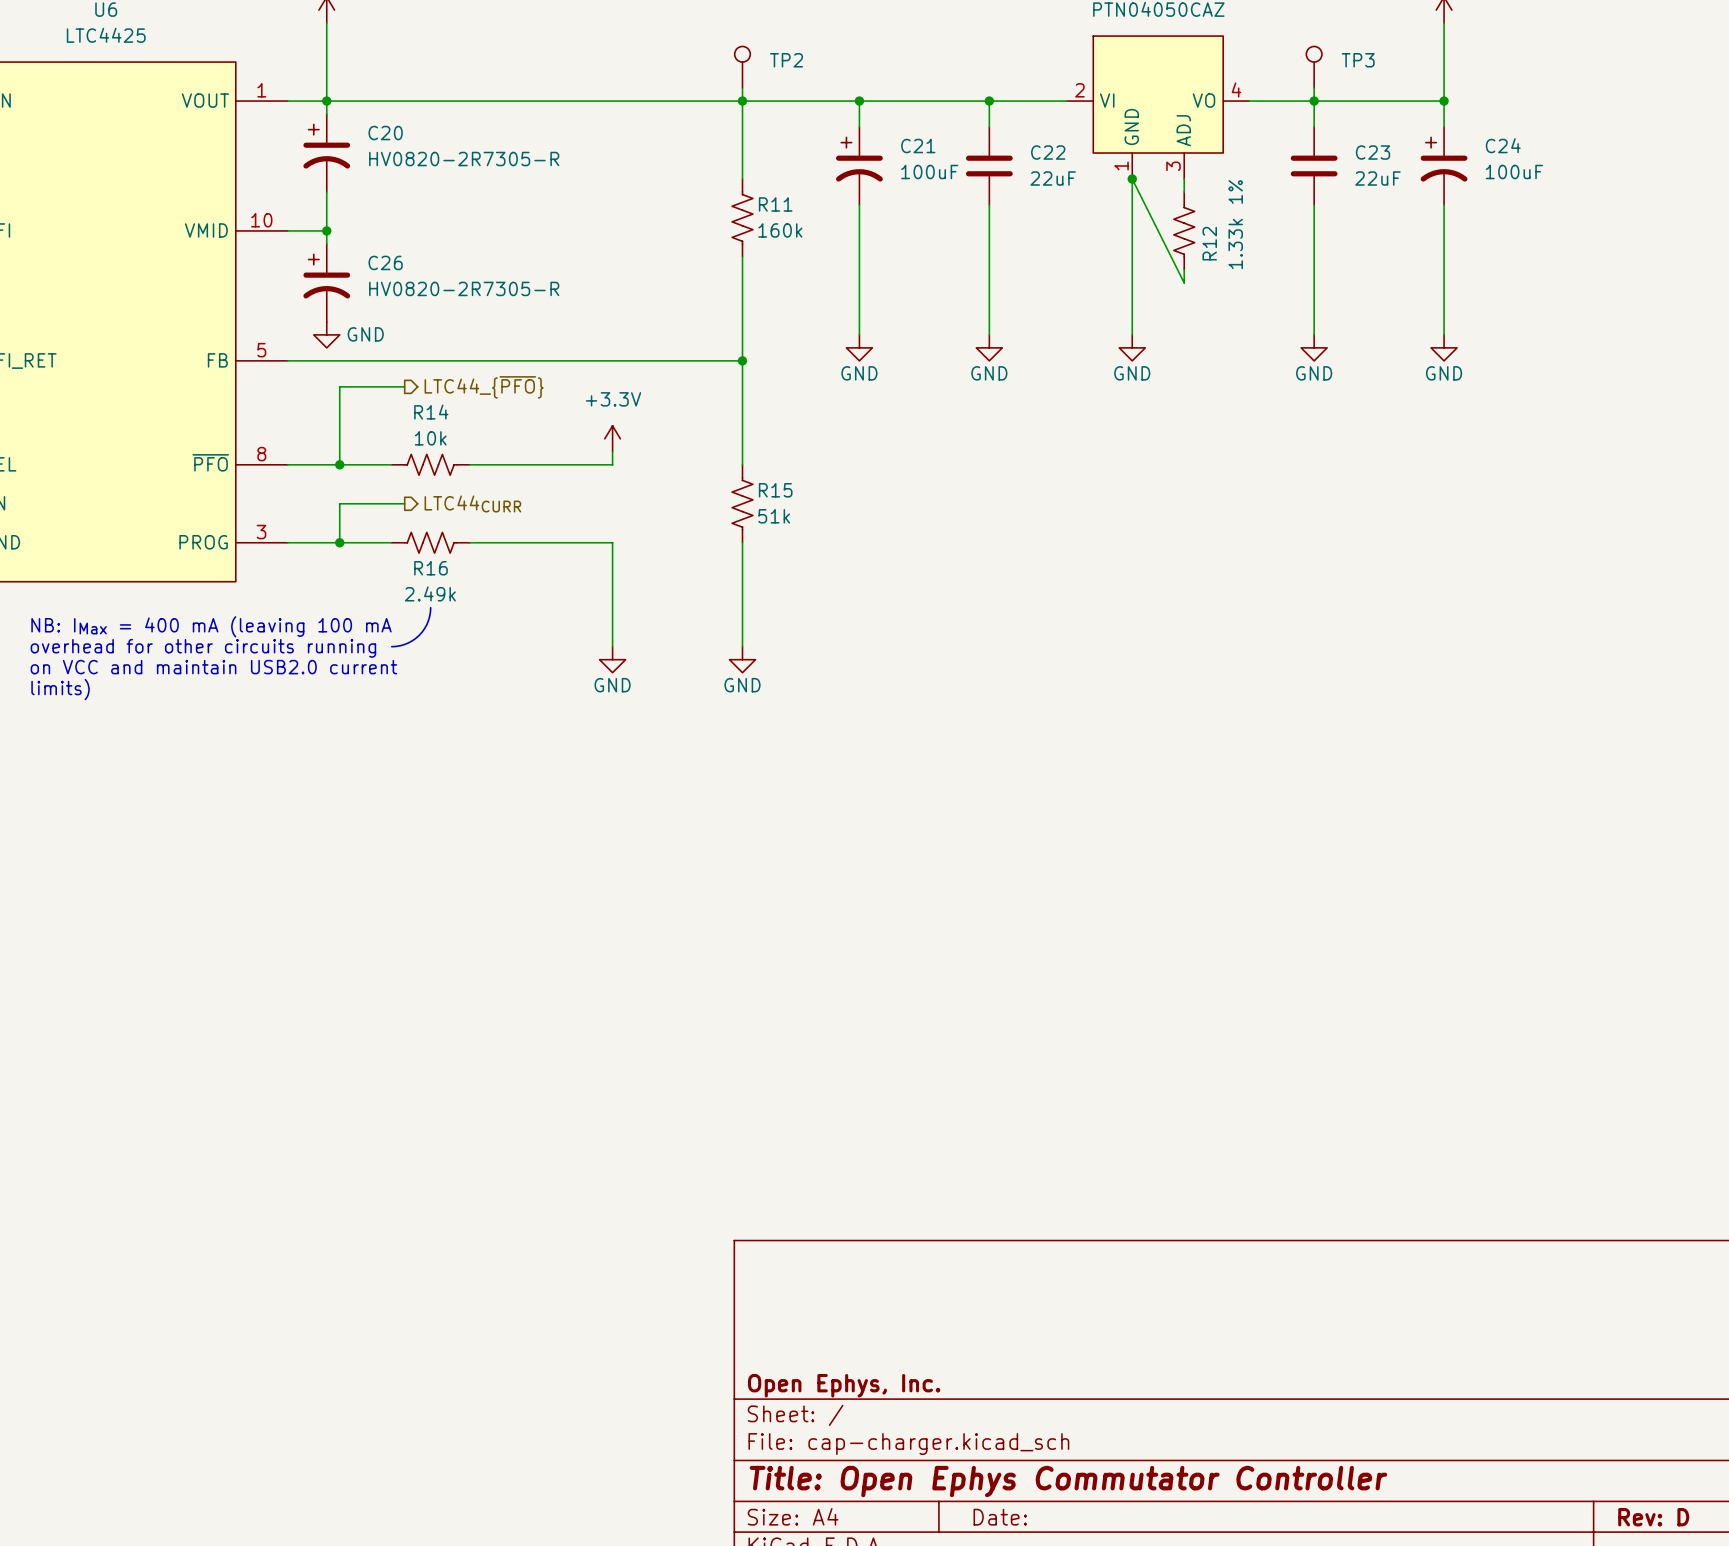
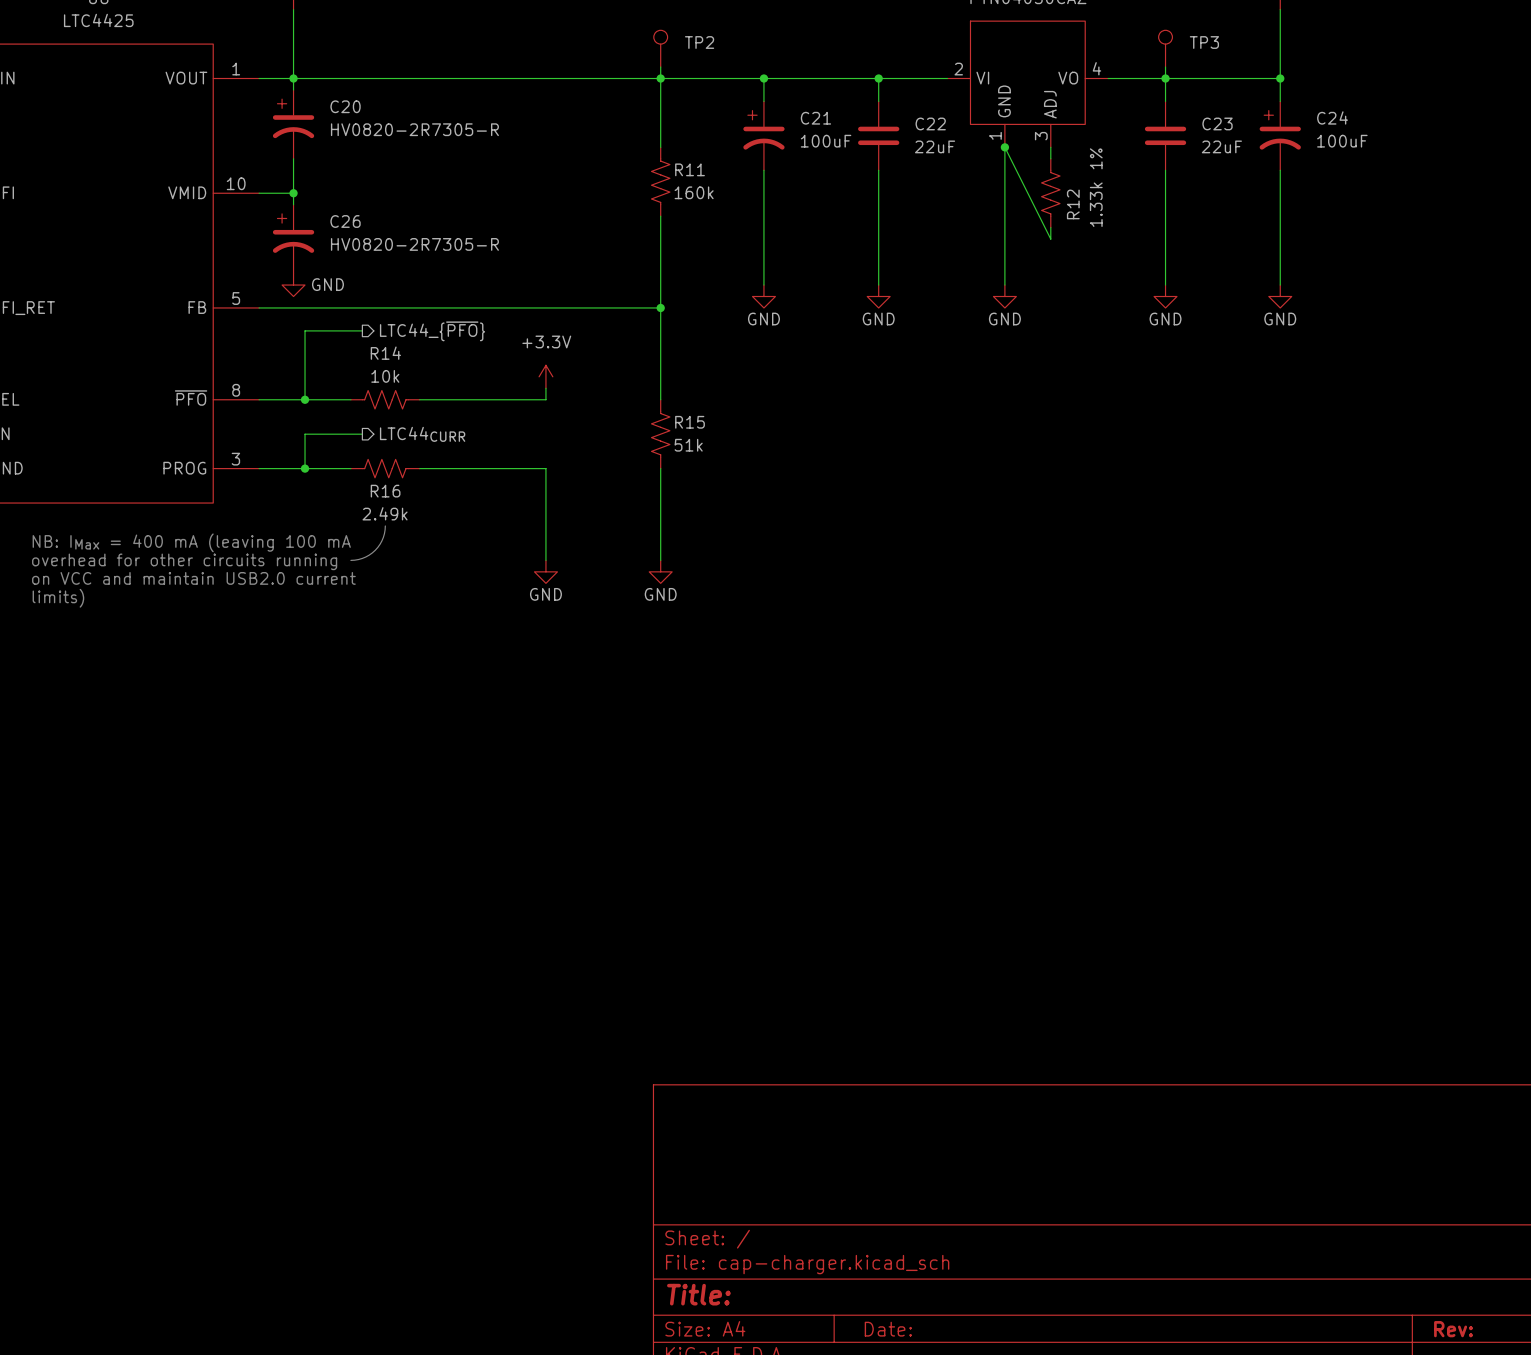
title block: Open Ephys, Inc. (844, 1385) -> none
title block: Title: Open Ephys Commutator Controller (1068, 1481) -> Title: (698, 1294)
title block: Rev: D (1653, 1517) -> Rev: (1453, 1329)

